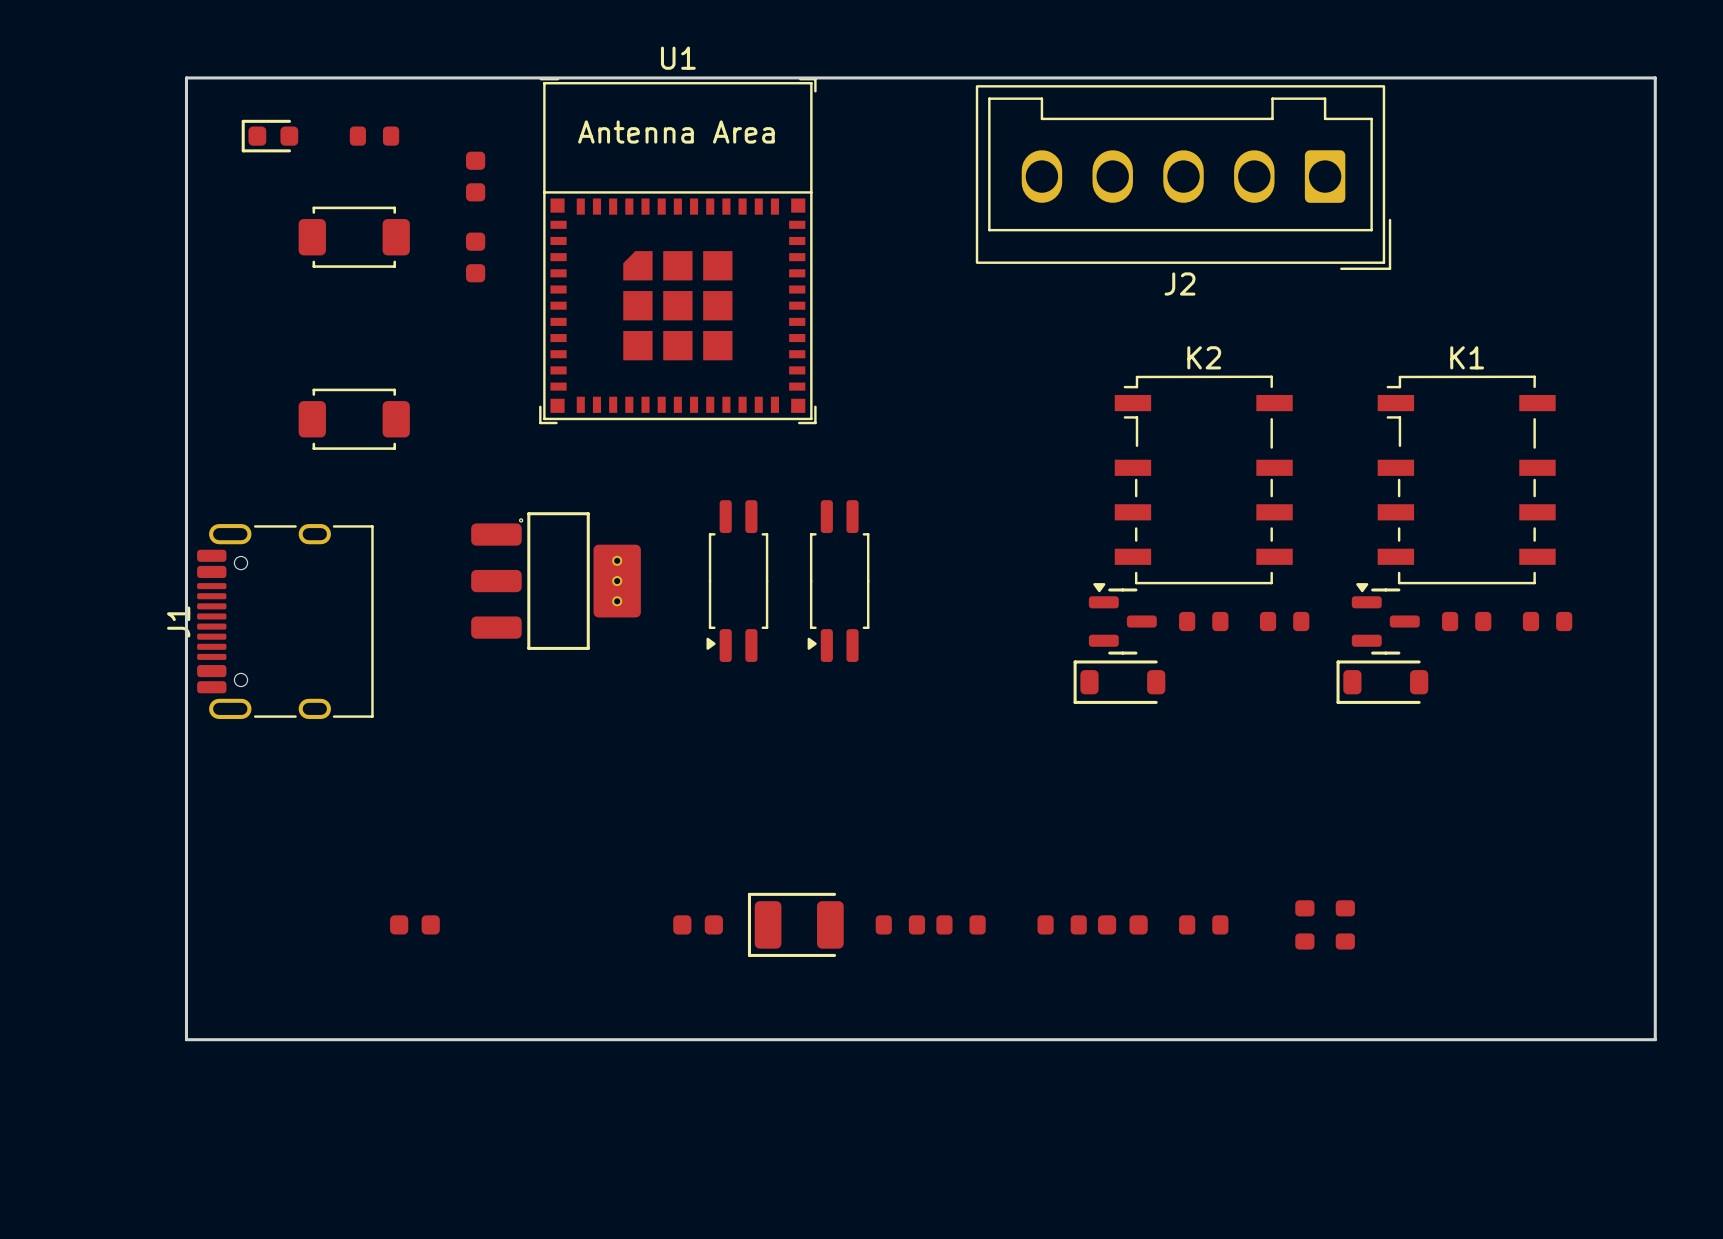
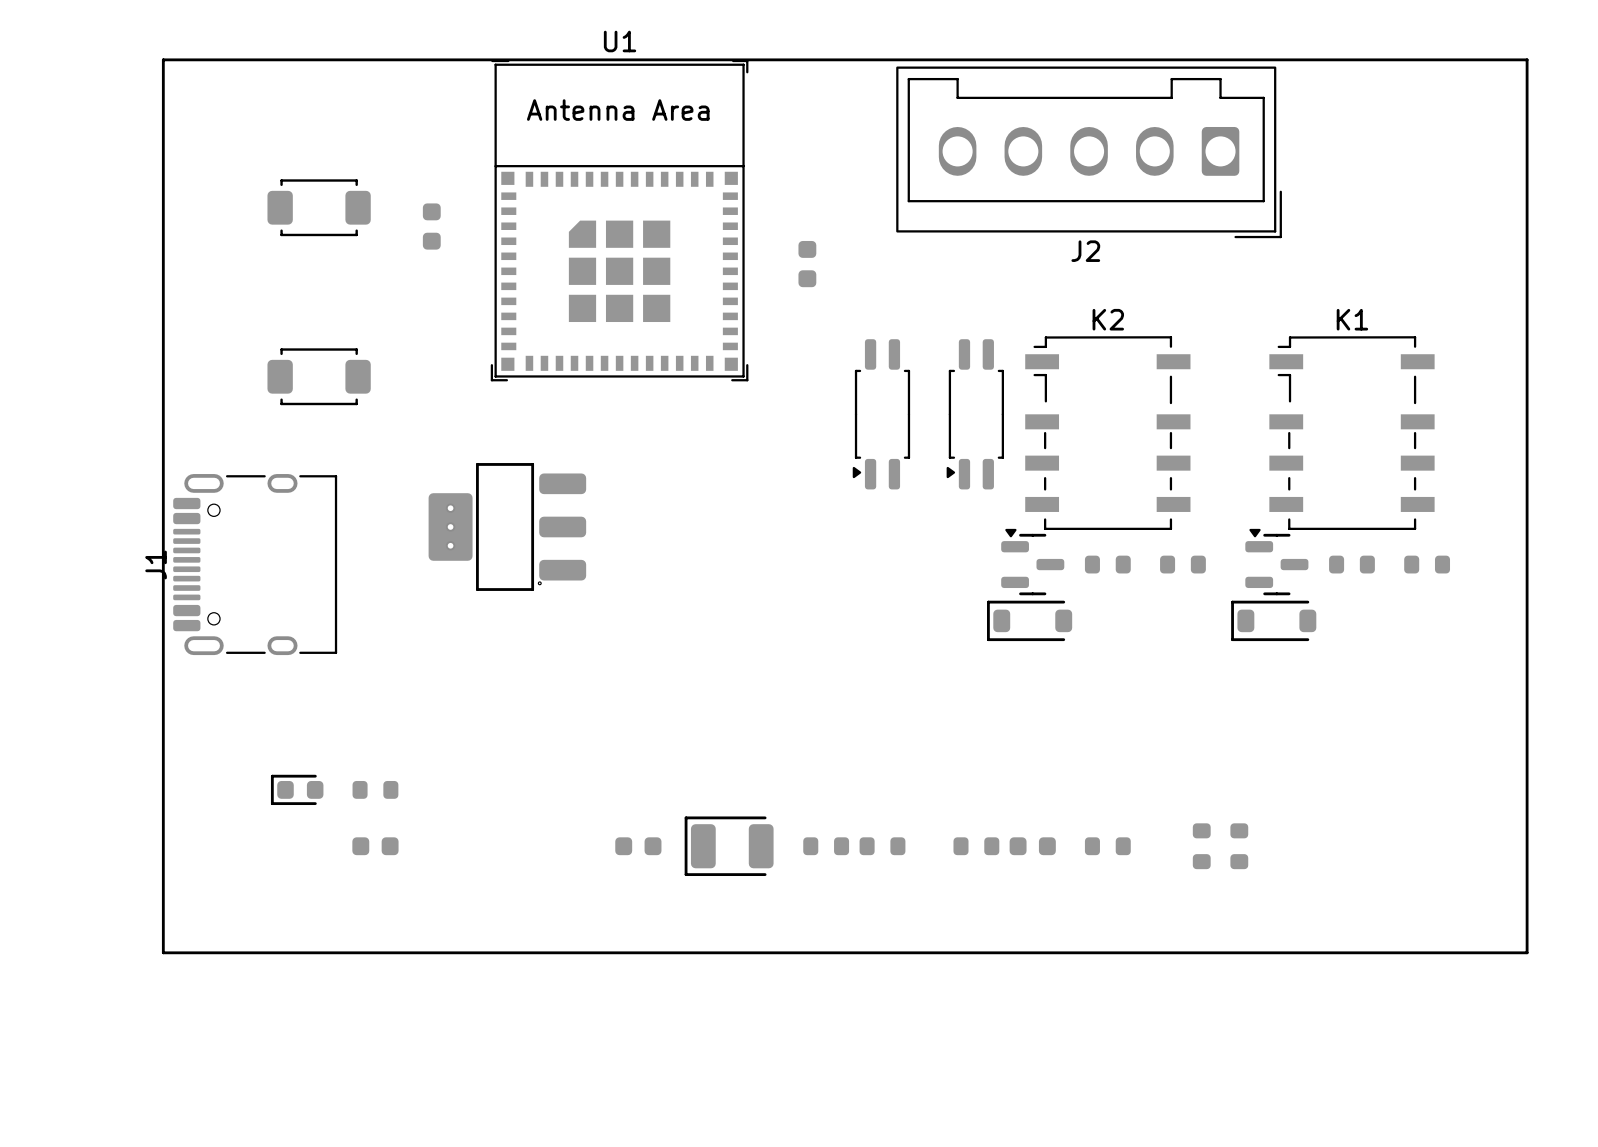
part: (269, 136) -> none
part: (374, 136) -> none
part position: (475, 176) -> (807, 264)
part: none -> (881, 414)
part: none -> (975, 414)
part rotation: 0° (556, 581) -> 180° (507, 526)
part: (737, 581) -> none
part: (838, 581) -> none
part: none -> (297, 789)
part: none -> (375, 789)

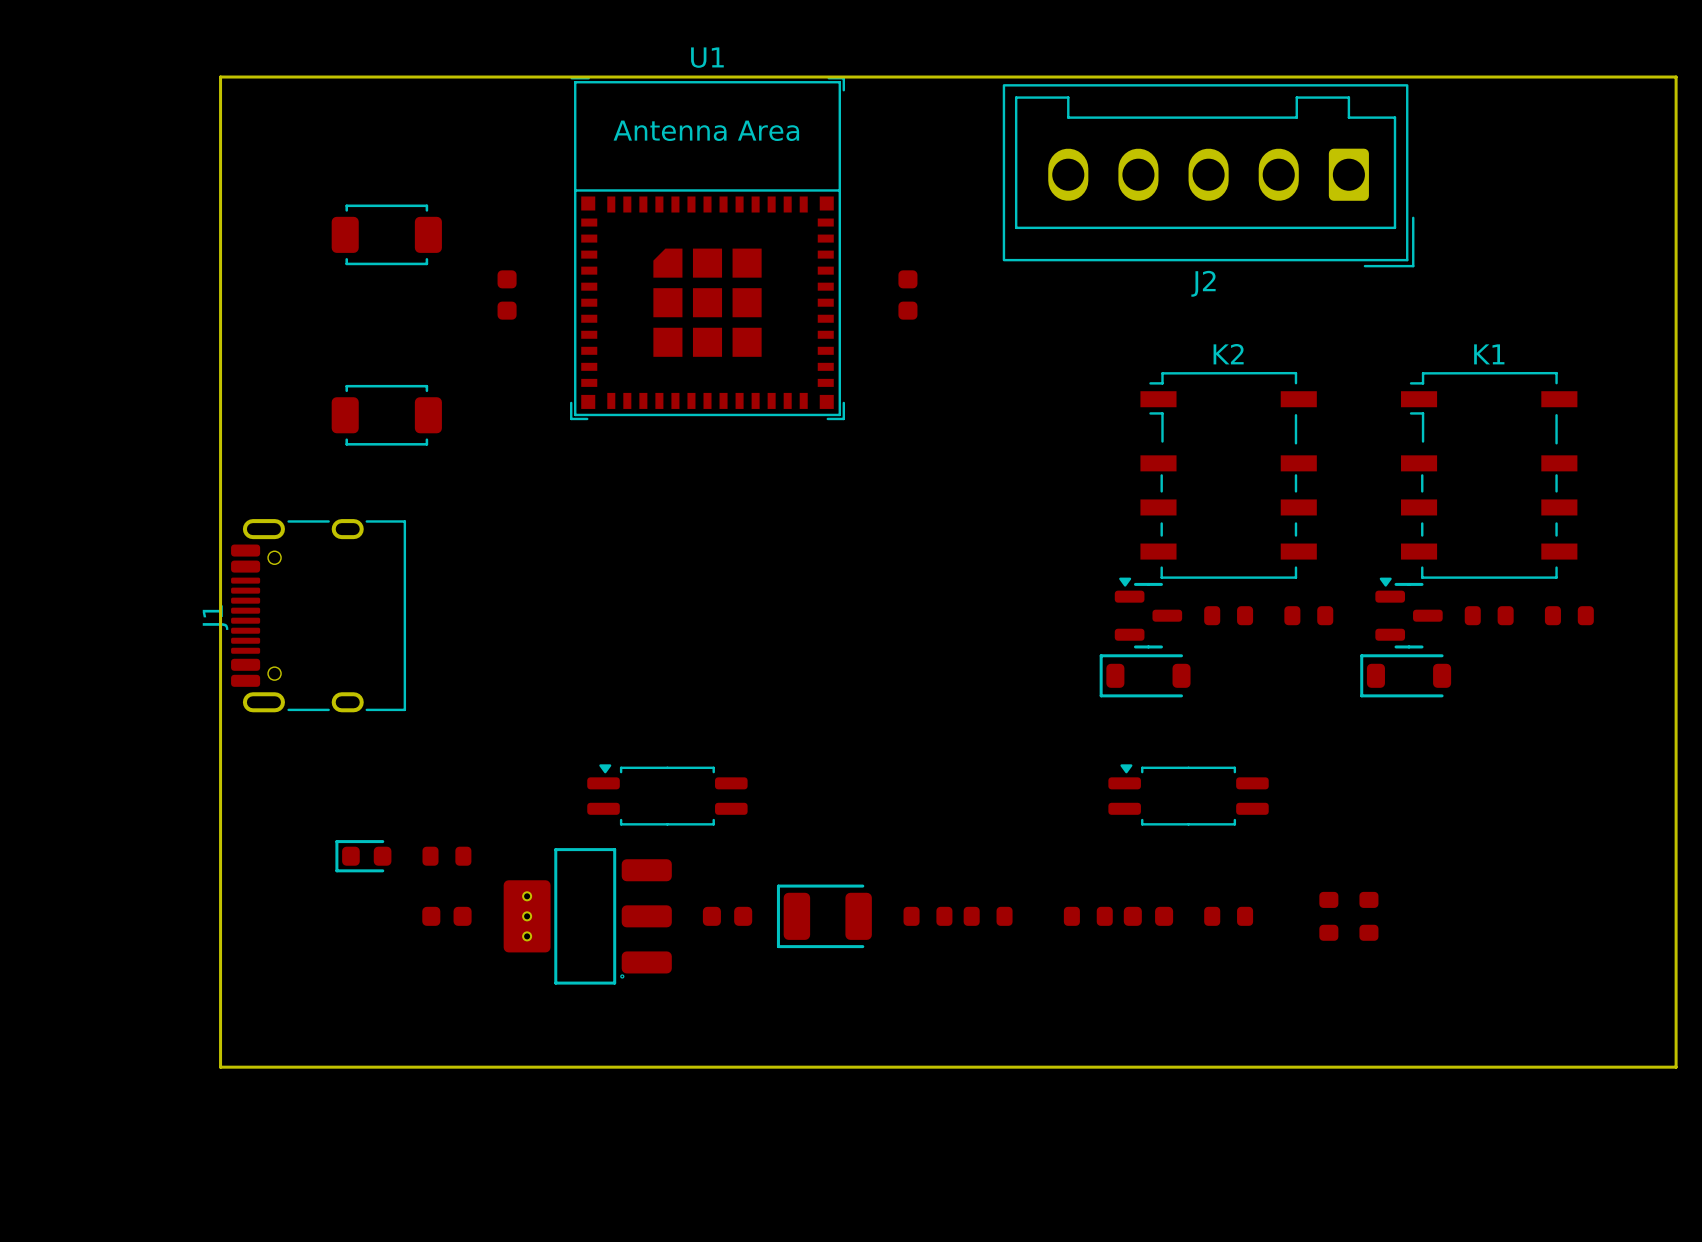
part position: (431, 226) -> (507, 294)
part: (881, 414) -> none
part: (975, 414) -> none
part position: (507, 526) -> (587, 916)
part: none -> (667, 794)
part: none -> (1188, 794)
board edge: (163, 952) (1527, 952) -> (220, 1030) (220, 1067) (1676, 1067) (1676, 1030)

